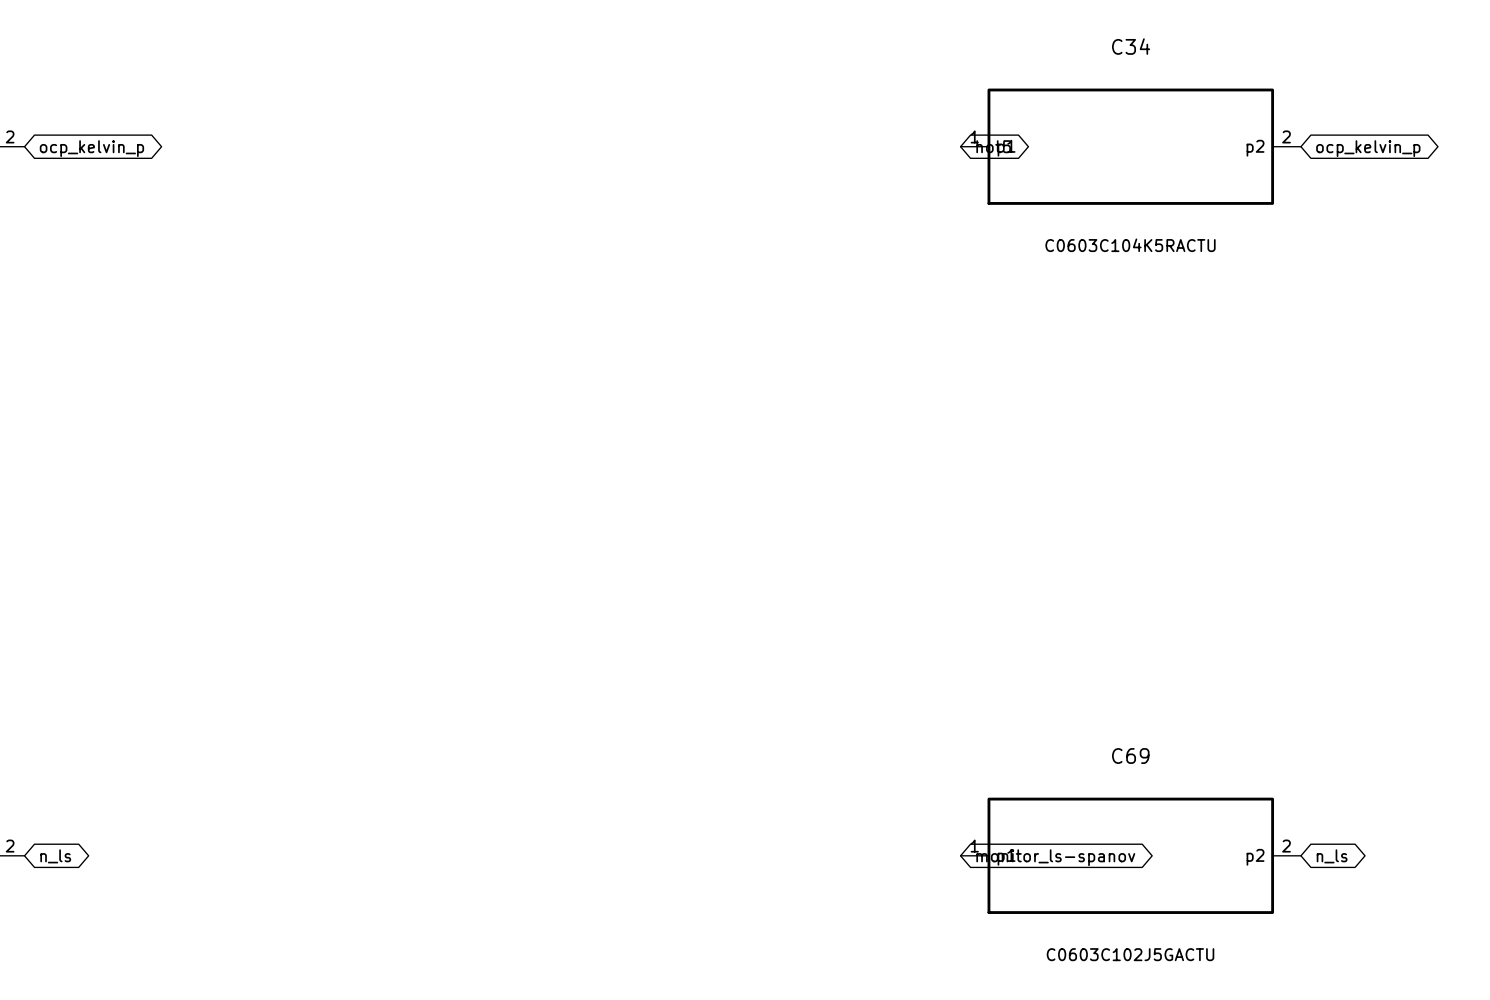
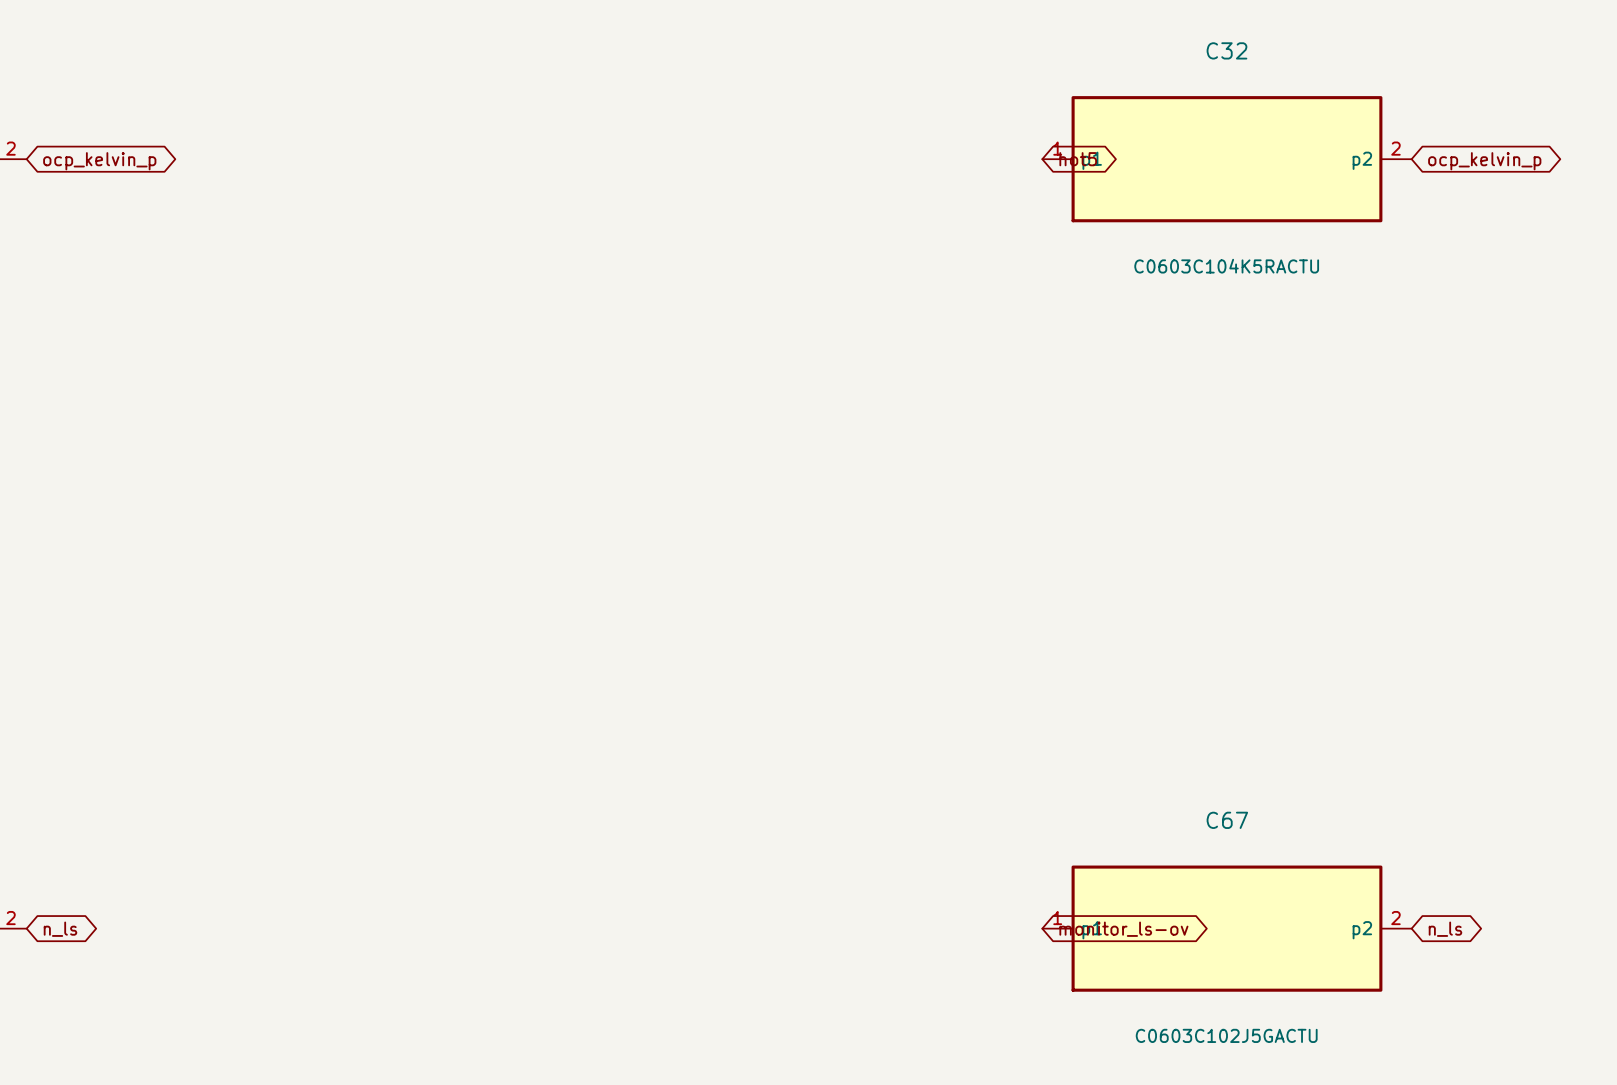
C34 name: C34 (1131, 46) -> C32 (1226, 50)
C69 name: C69 (1130, 756) -> C67 (1227, 820)
global label: monitor_ls-spanov (1055, 857) -> monitor_ls-ov (1123, 929)

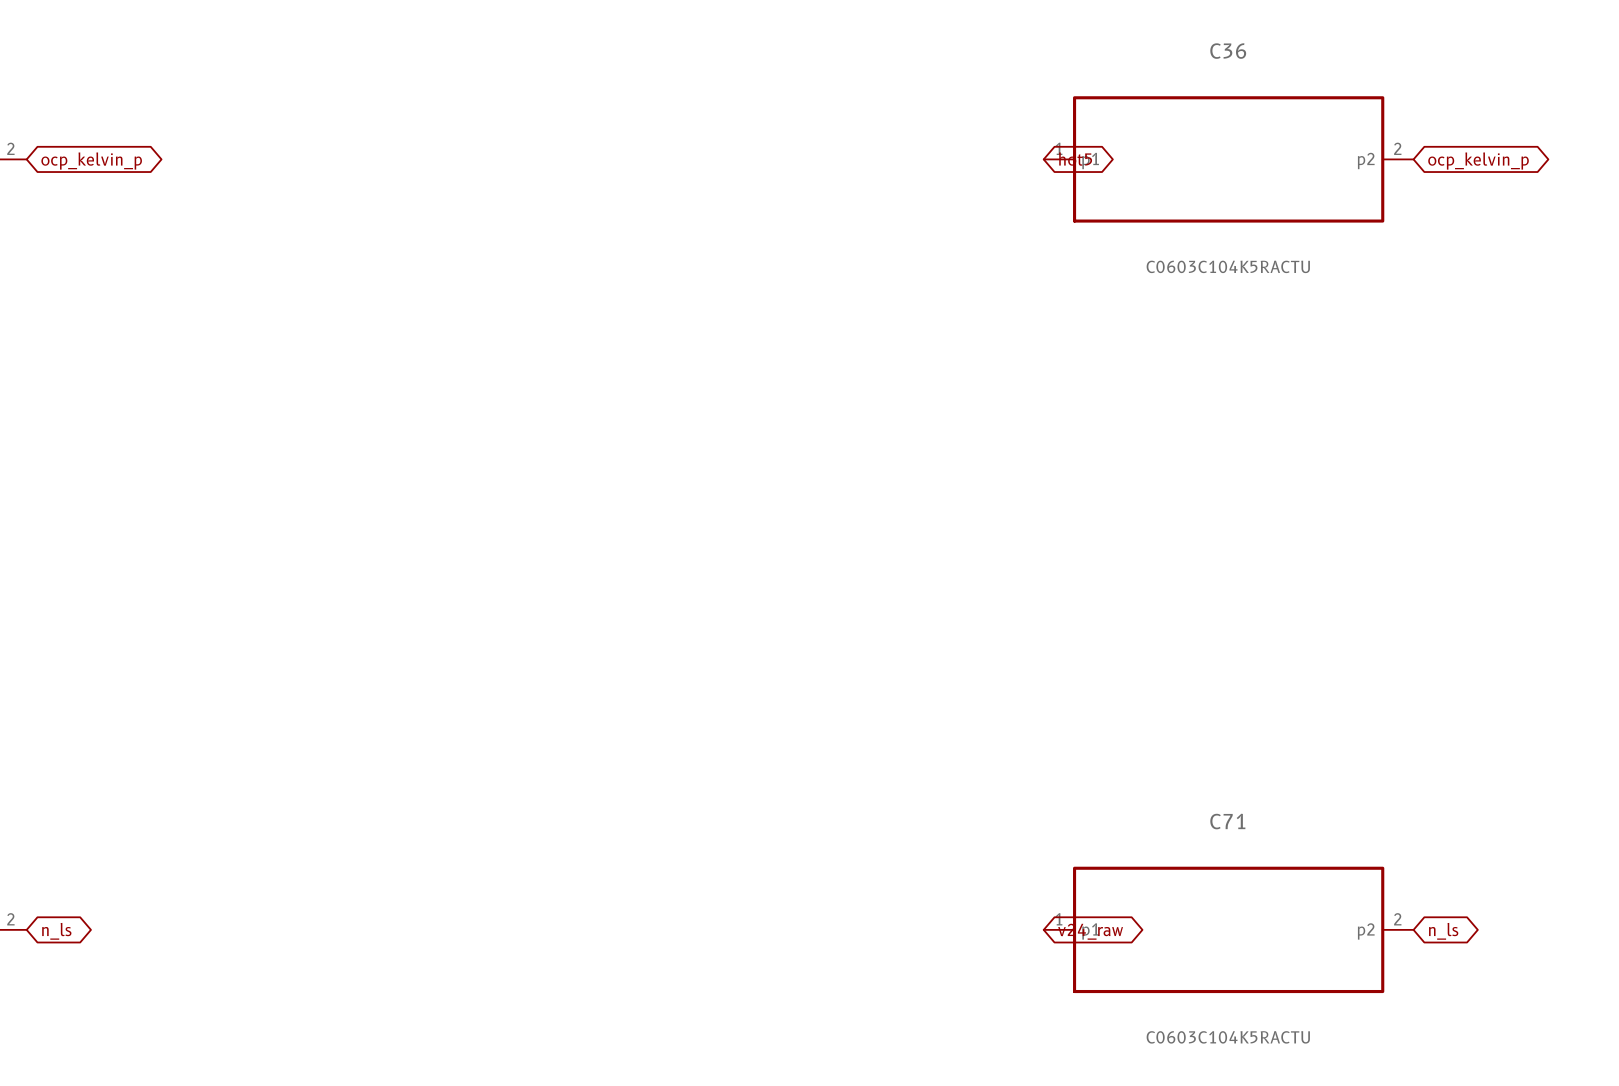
C32 name: C32 (1226, 50) -> C36 (1228, 51)
C67 name: C67 (1227, 820) -> C71 (1227, 821)
global label: monitor_ls-ov (1123, 929) -> v24_raw (1090, 931)
C67 value: C0603C102J5GACTU (1226, 1035) -> C0603C104K5RACTU (1228, 1037)

